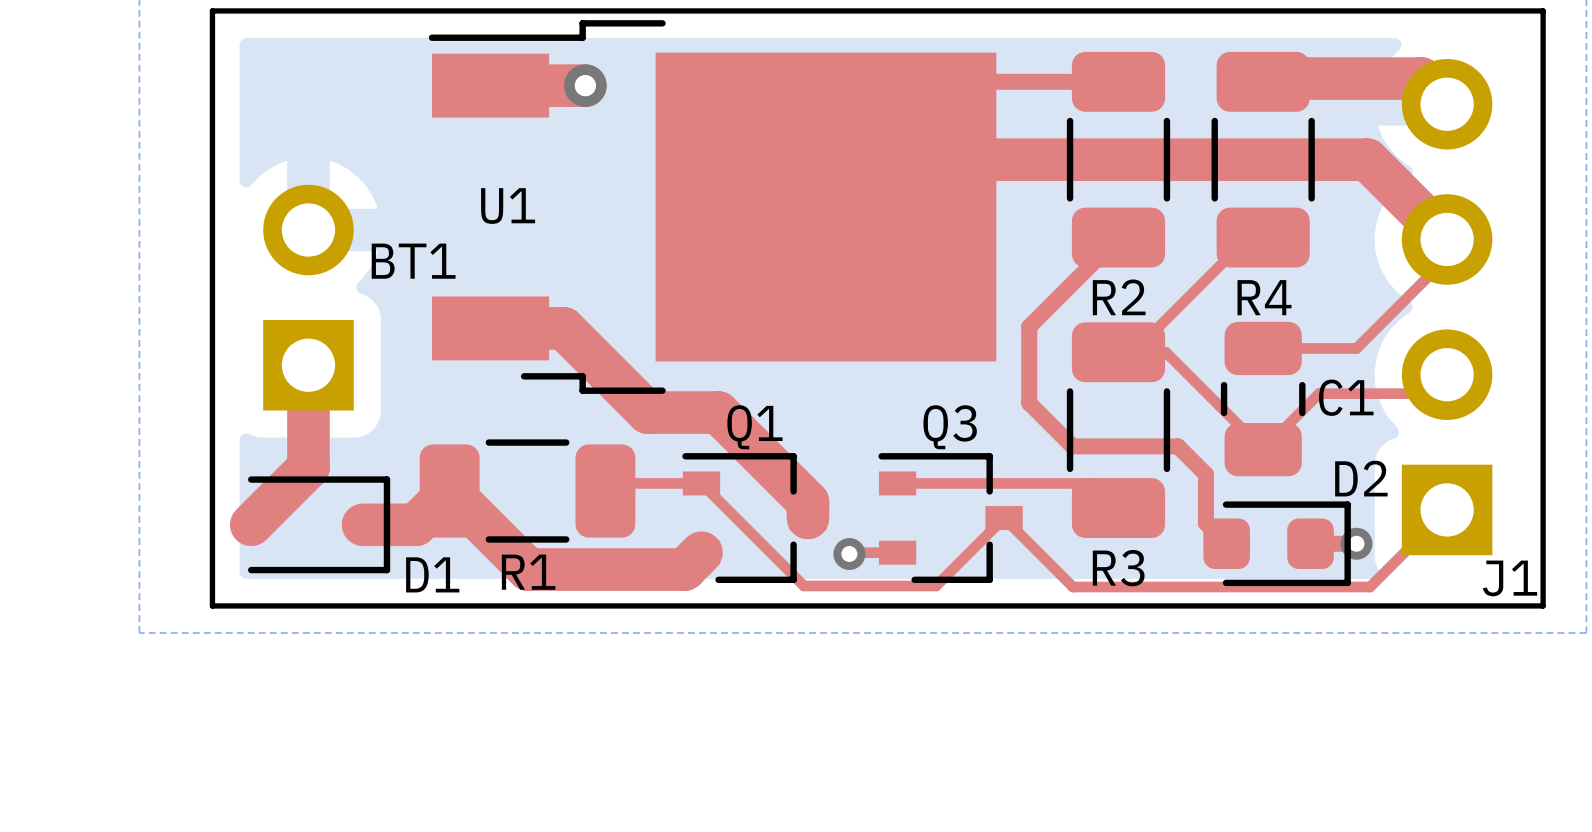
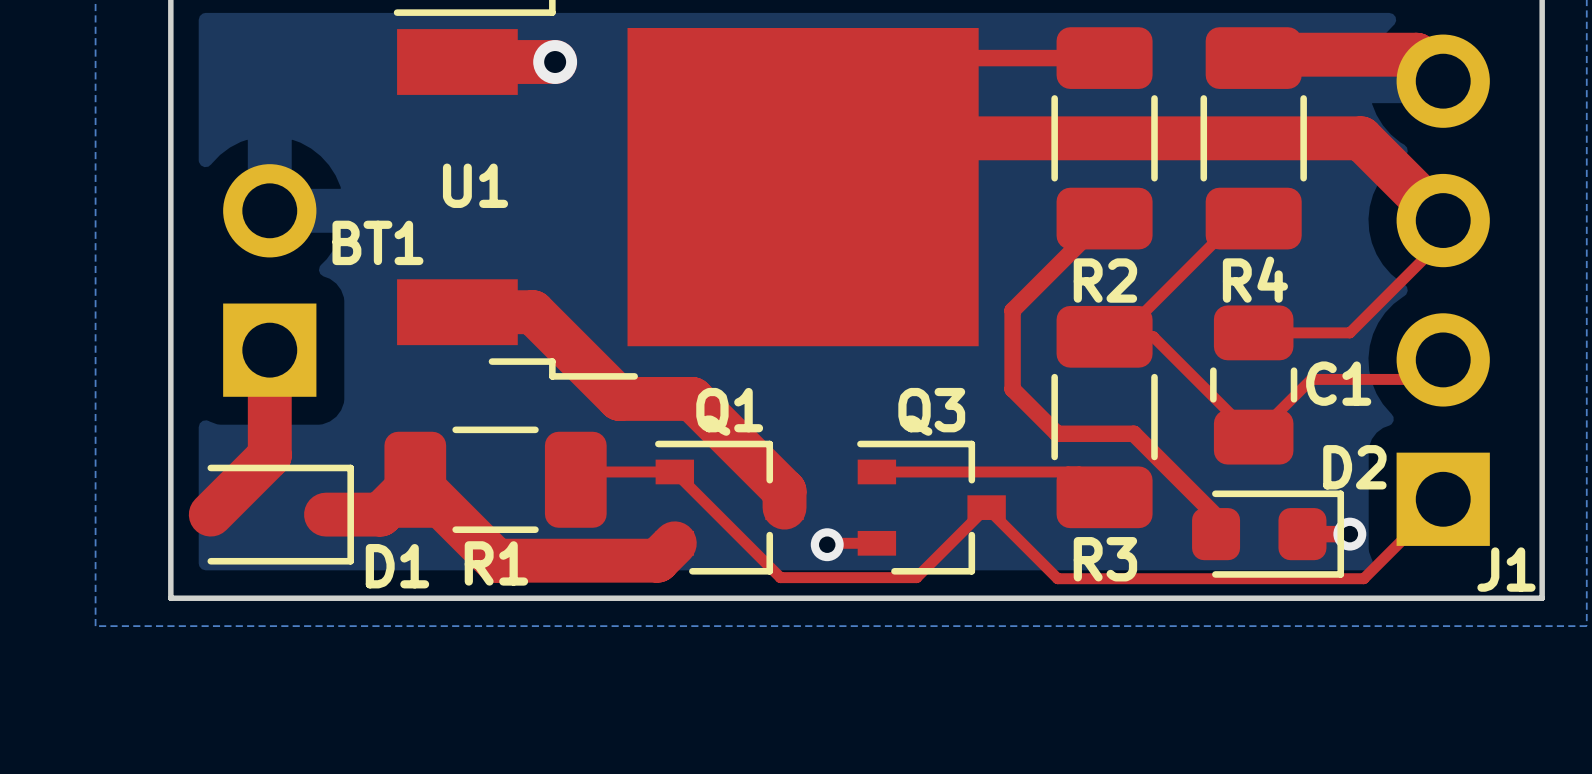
top track: (1146, 446) (1177, 446) (1205, 474) (1205, 523) (1226, 543) -> (1133, 433) (1216, 516) (1216, 534)

